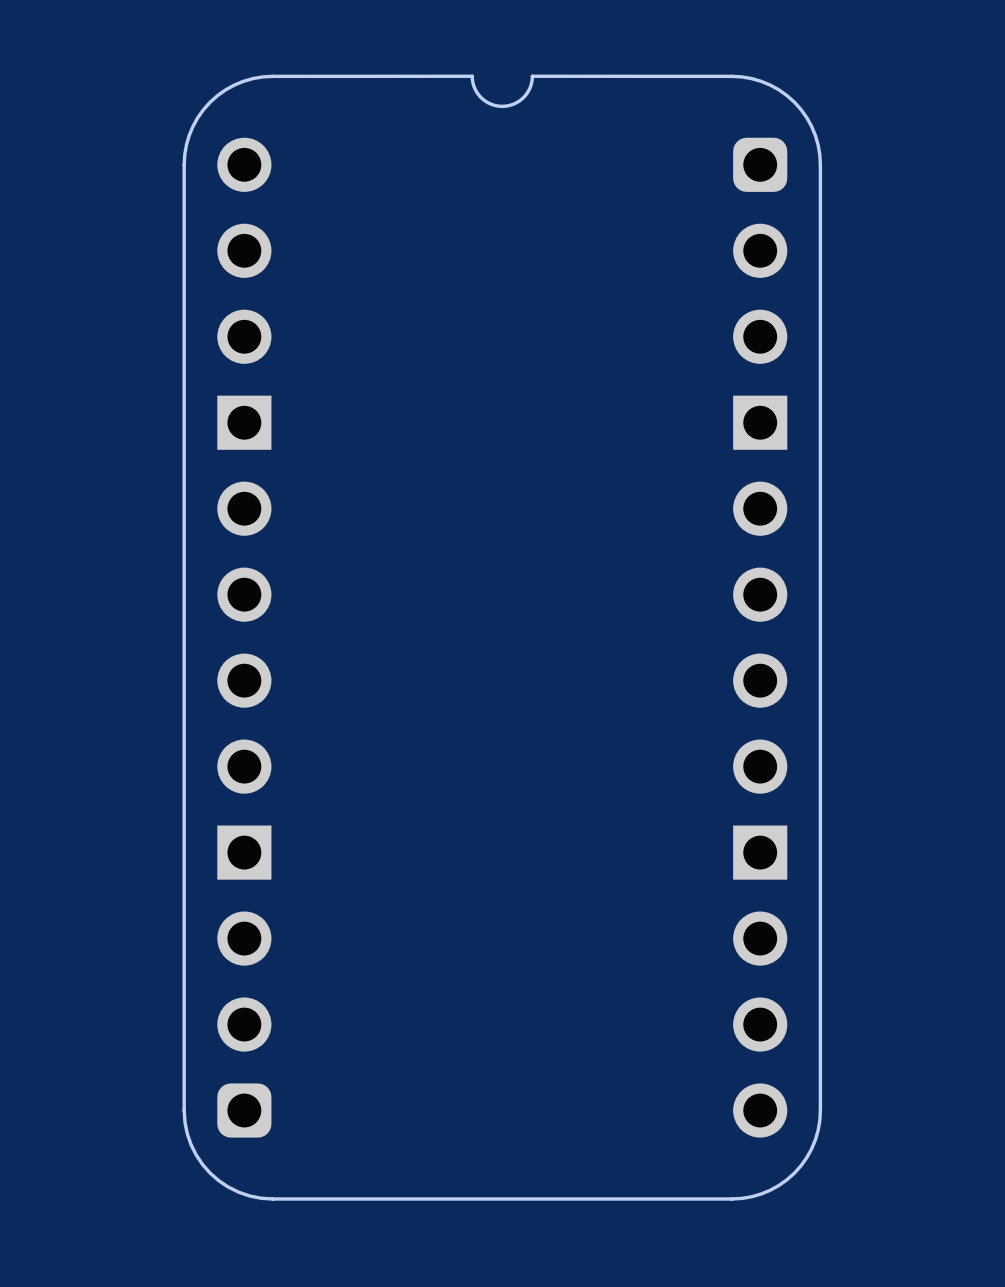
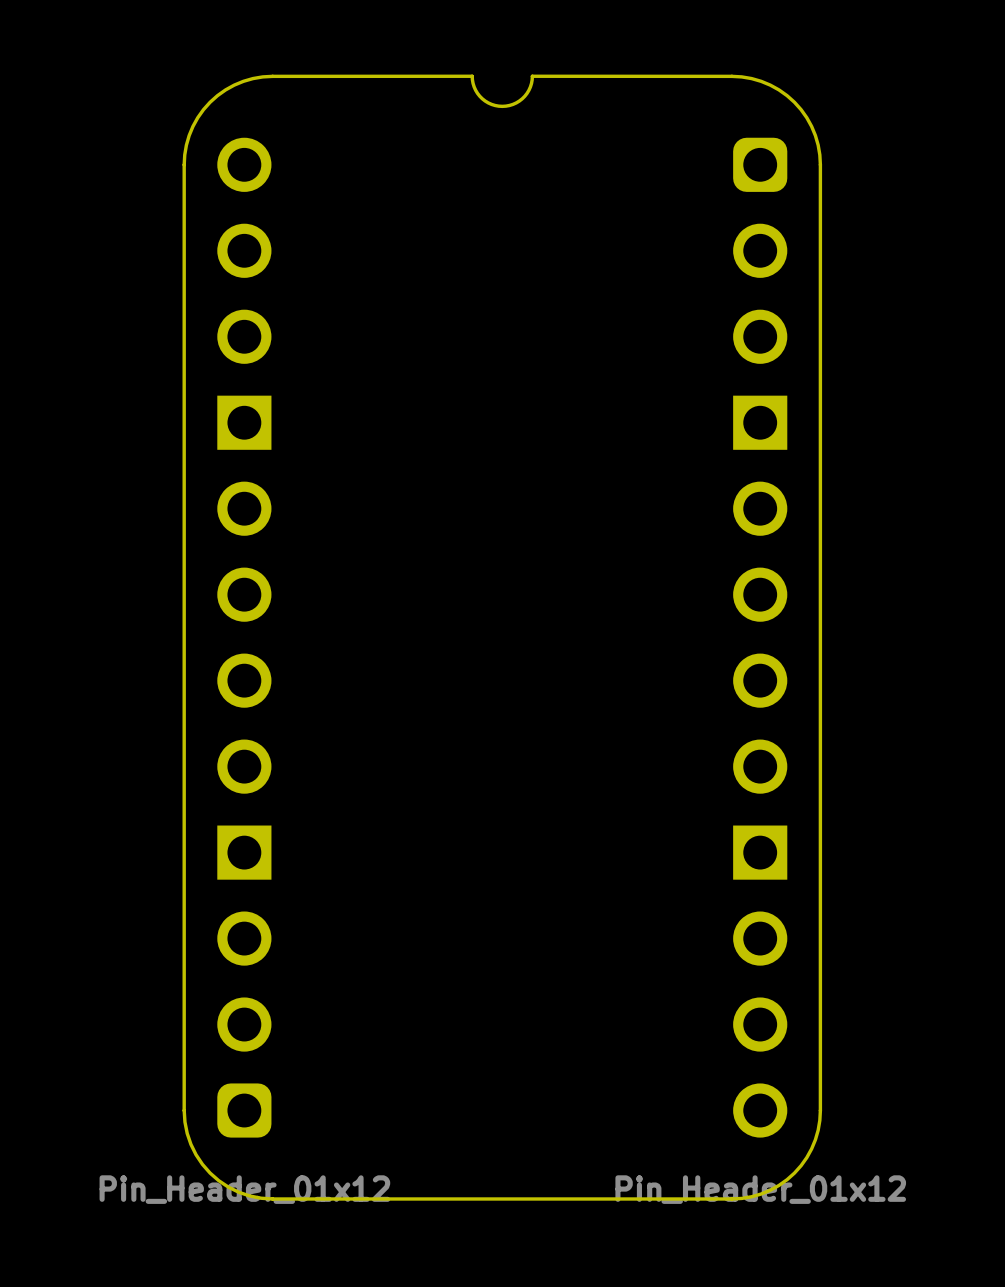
drawing: none -> [99, 1175, 391, 1204]
drawing: none -> [615, 1175, 907, 1204]

